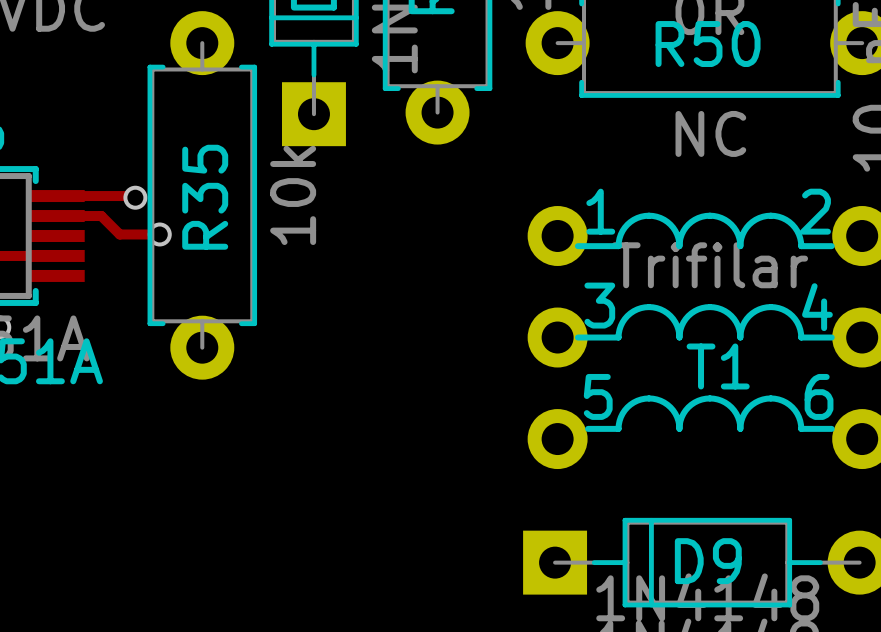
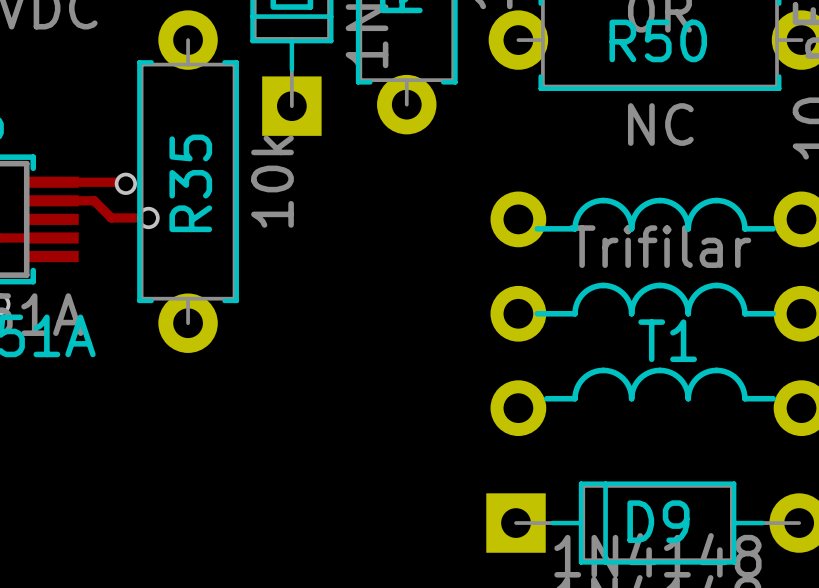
T1 text: 1 (600, 211) -> none
T1 text: 2 (815, 211) -> none
T1 text: 3 (599, 305) -> none
T1 text: 4 (817, 307) -> none
T1 text: 5 (598, 396) -> none
T1 text: 6 (819, 396) -> none

